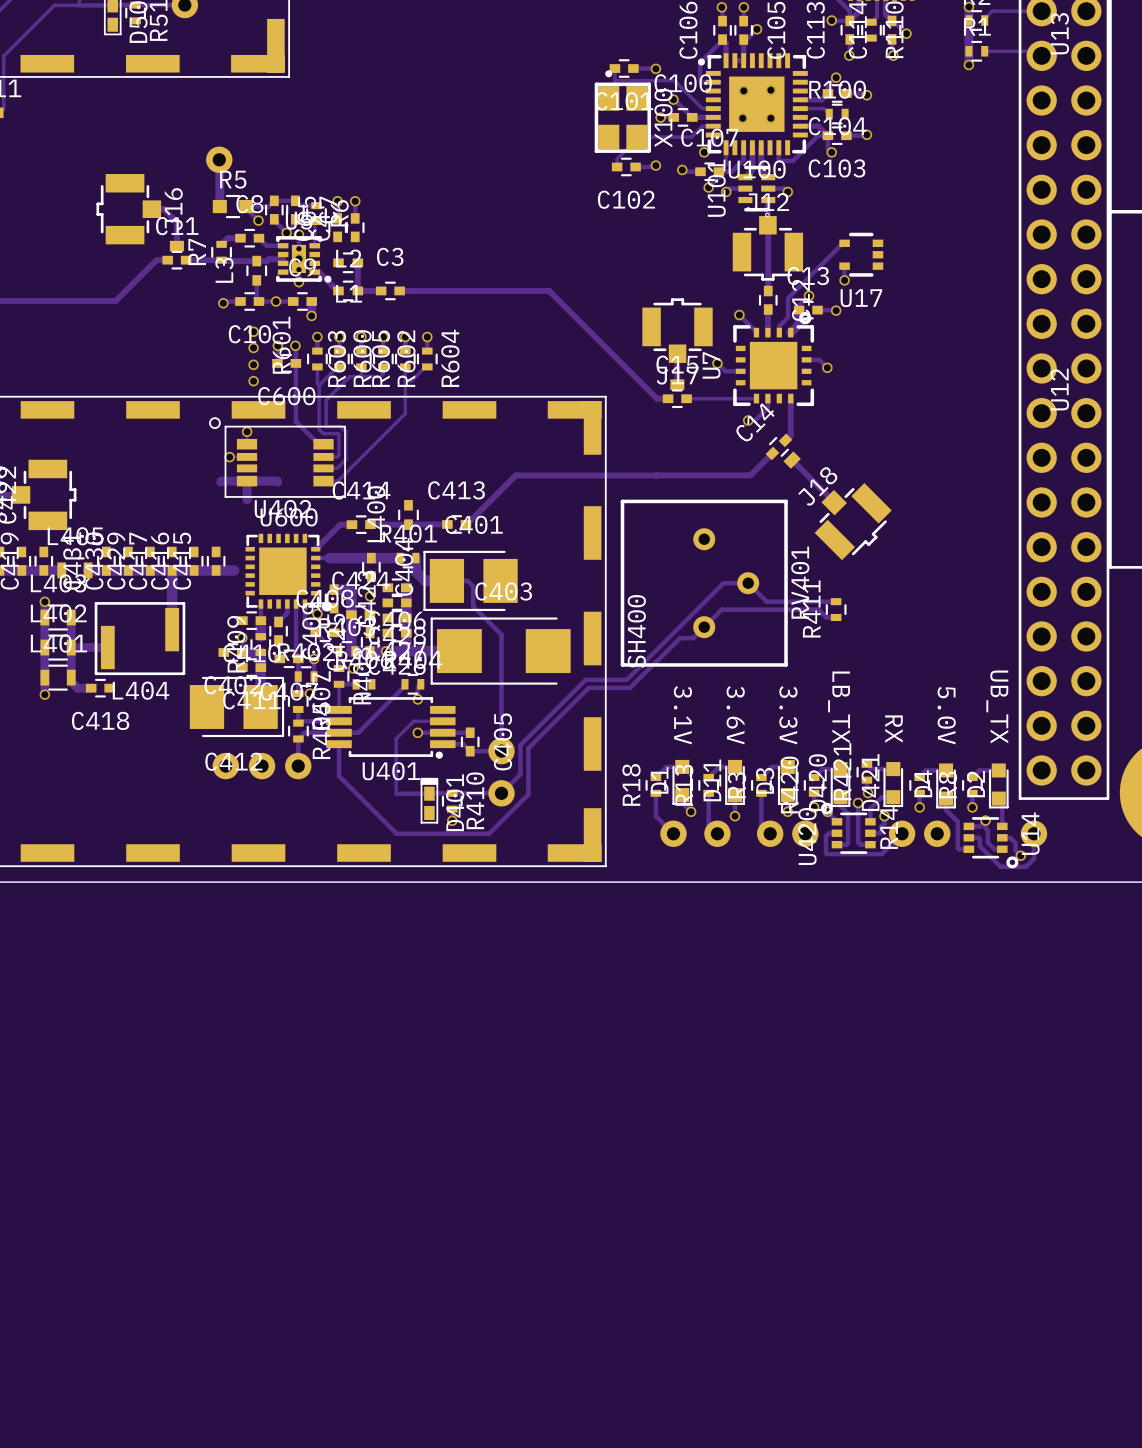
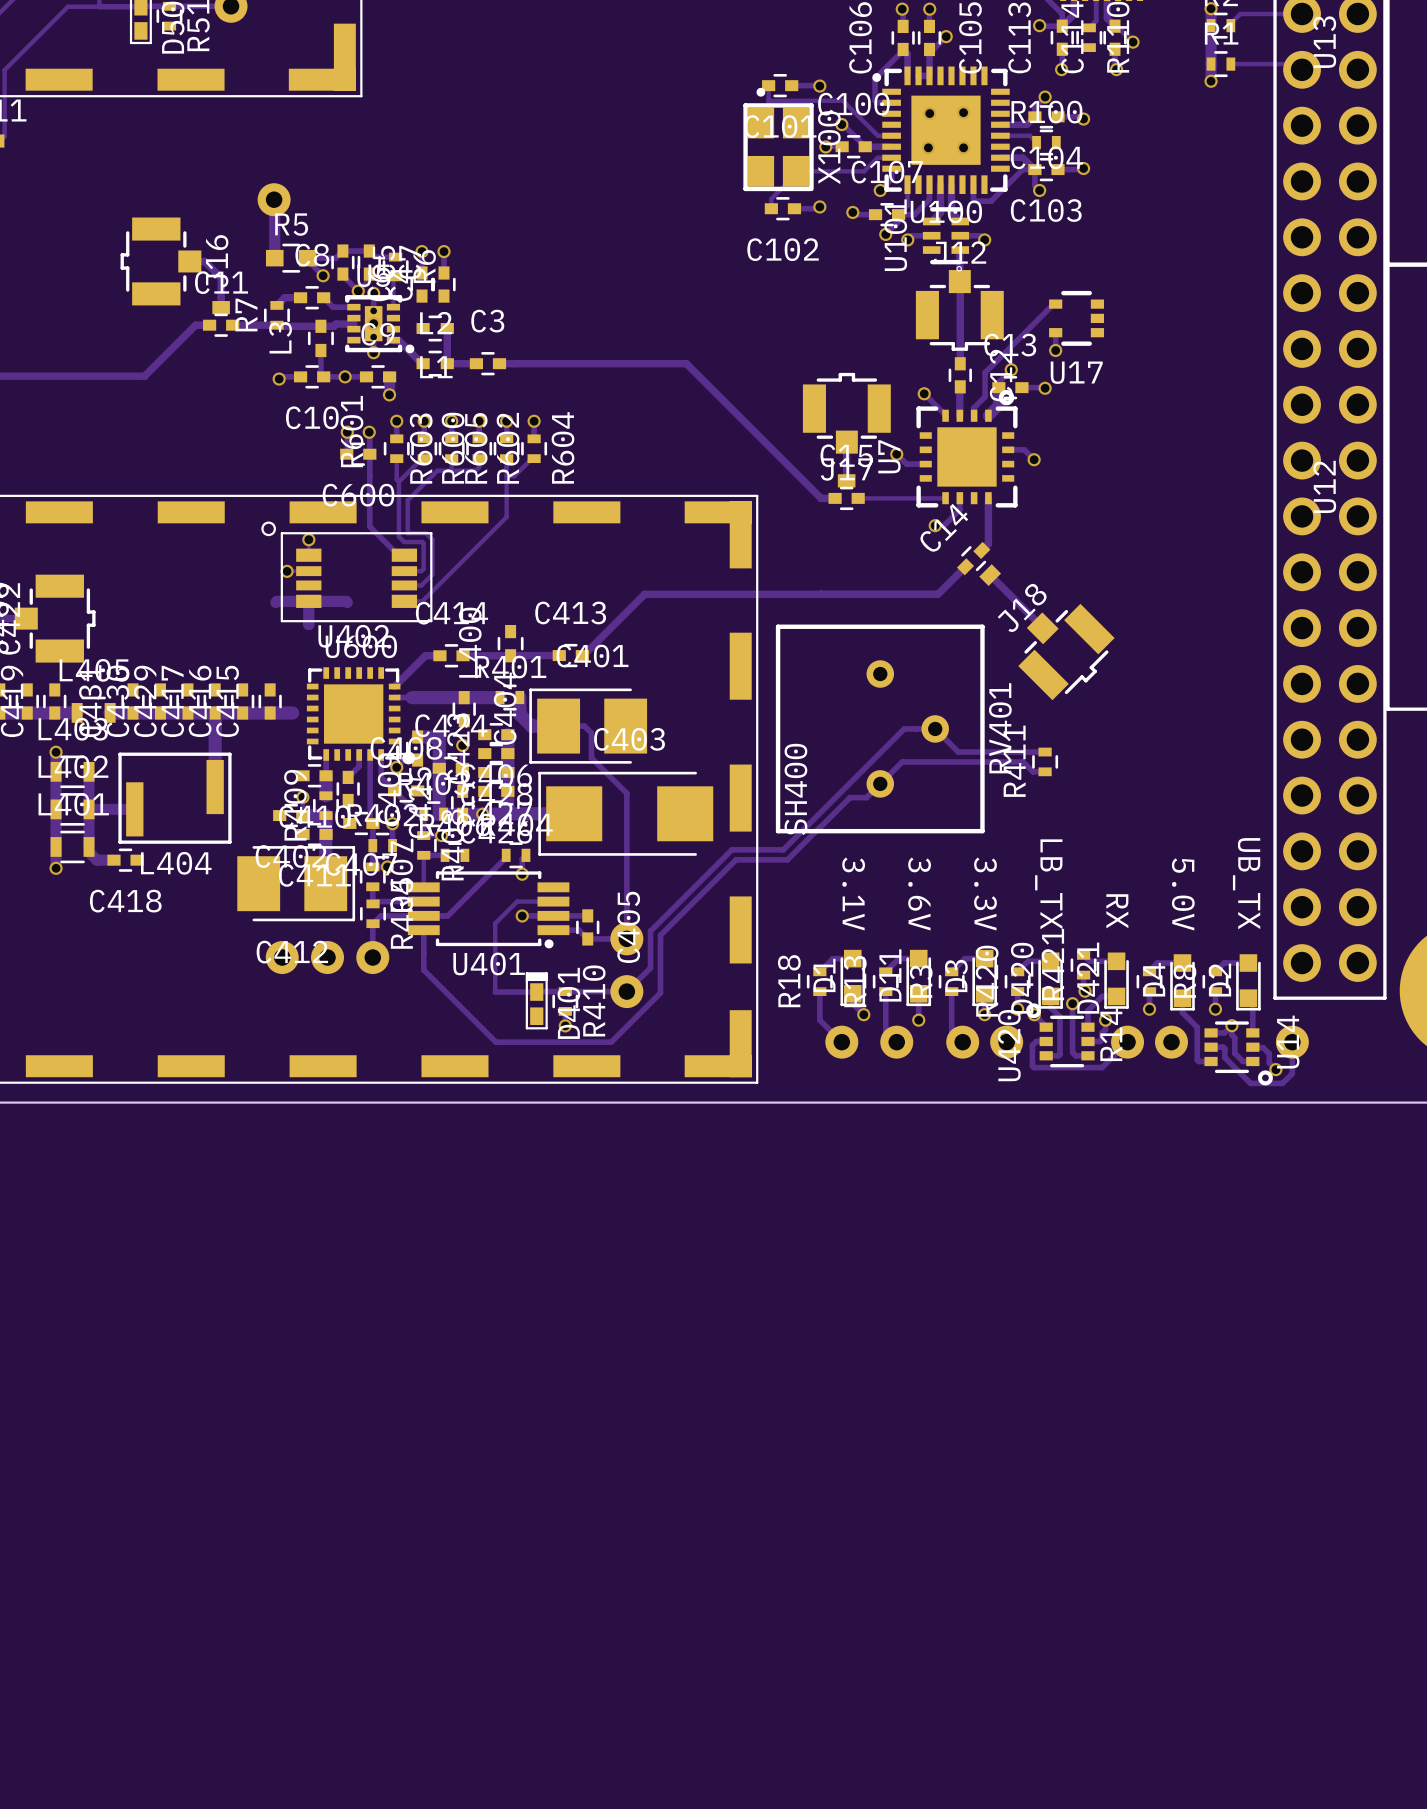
via: (253, 331) -> none
via: (253, 347) -> none
via: (253, 364) -> none
via: (253, 381) -> none

